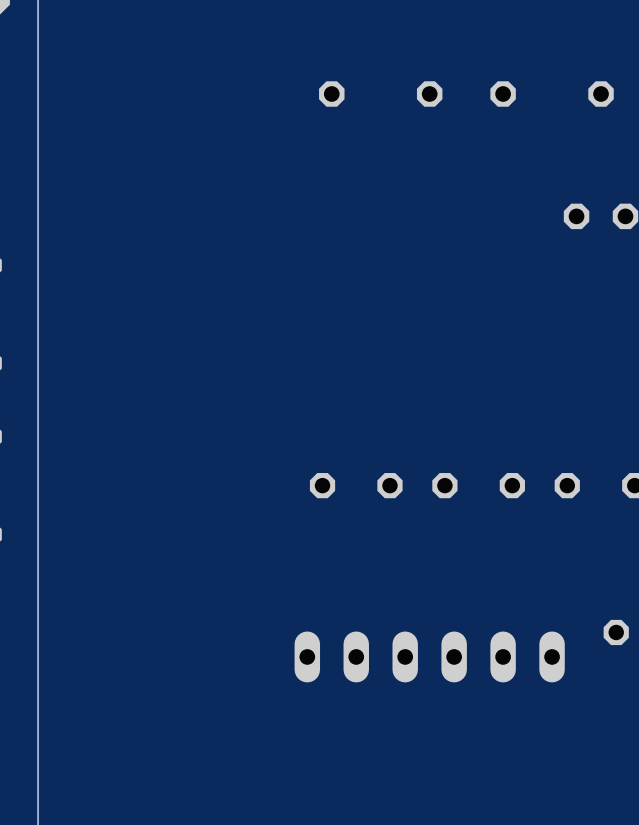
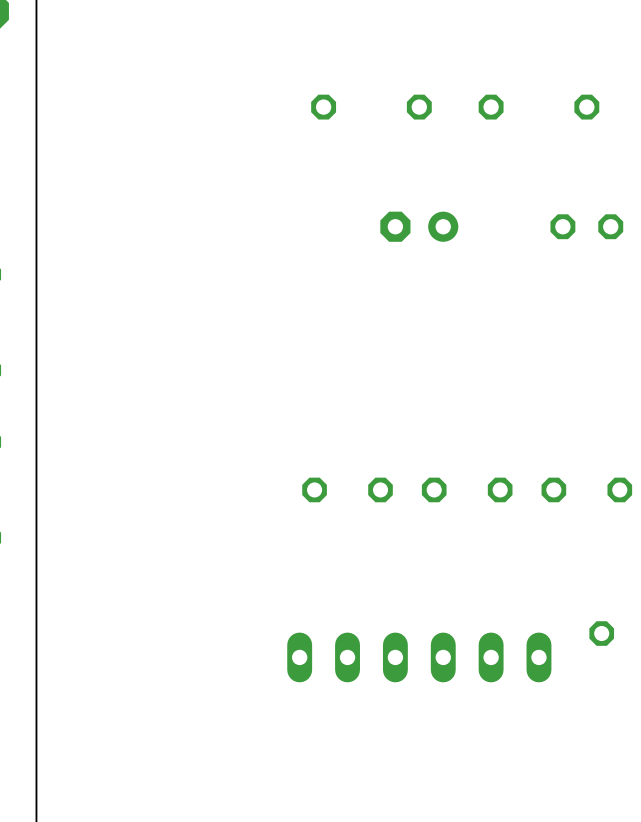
part: none -> (419, 226)

